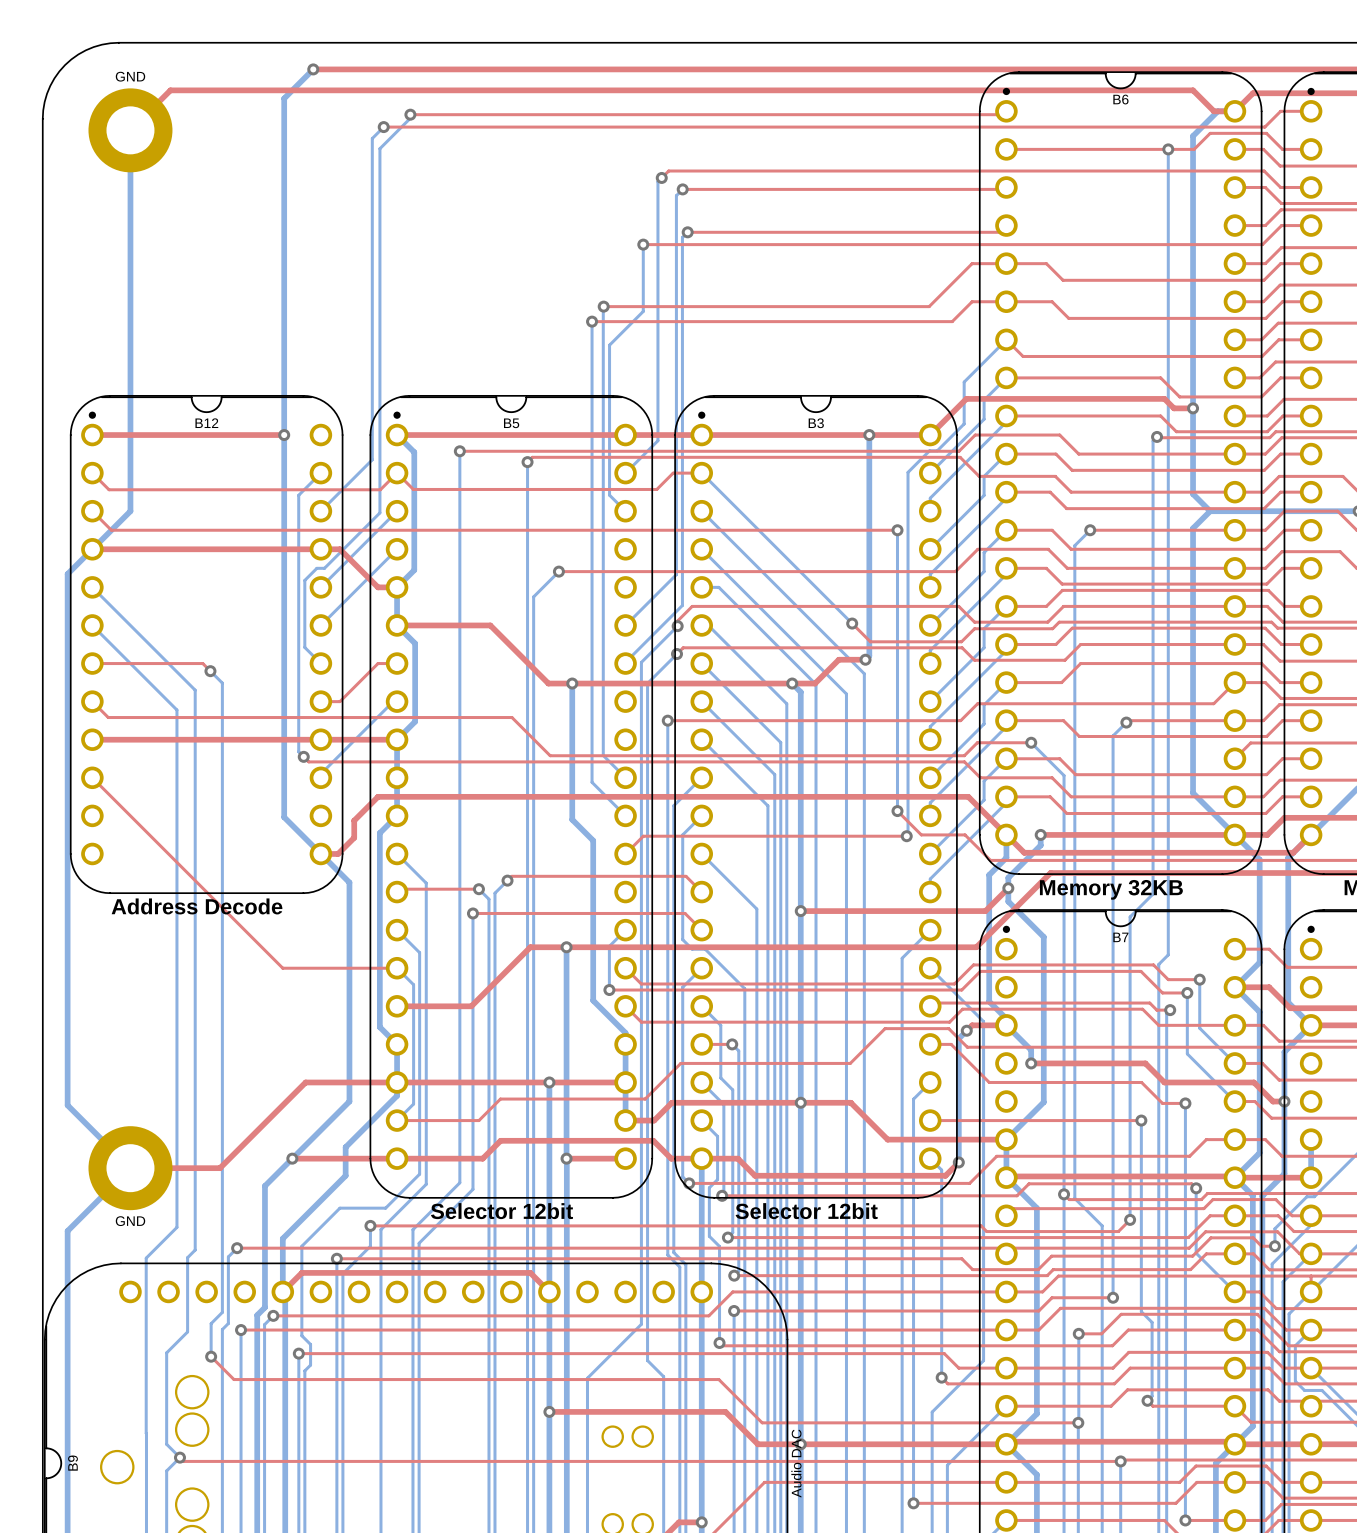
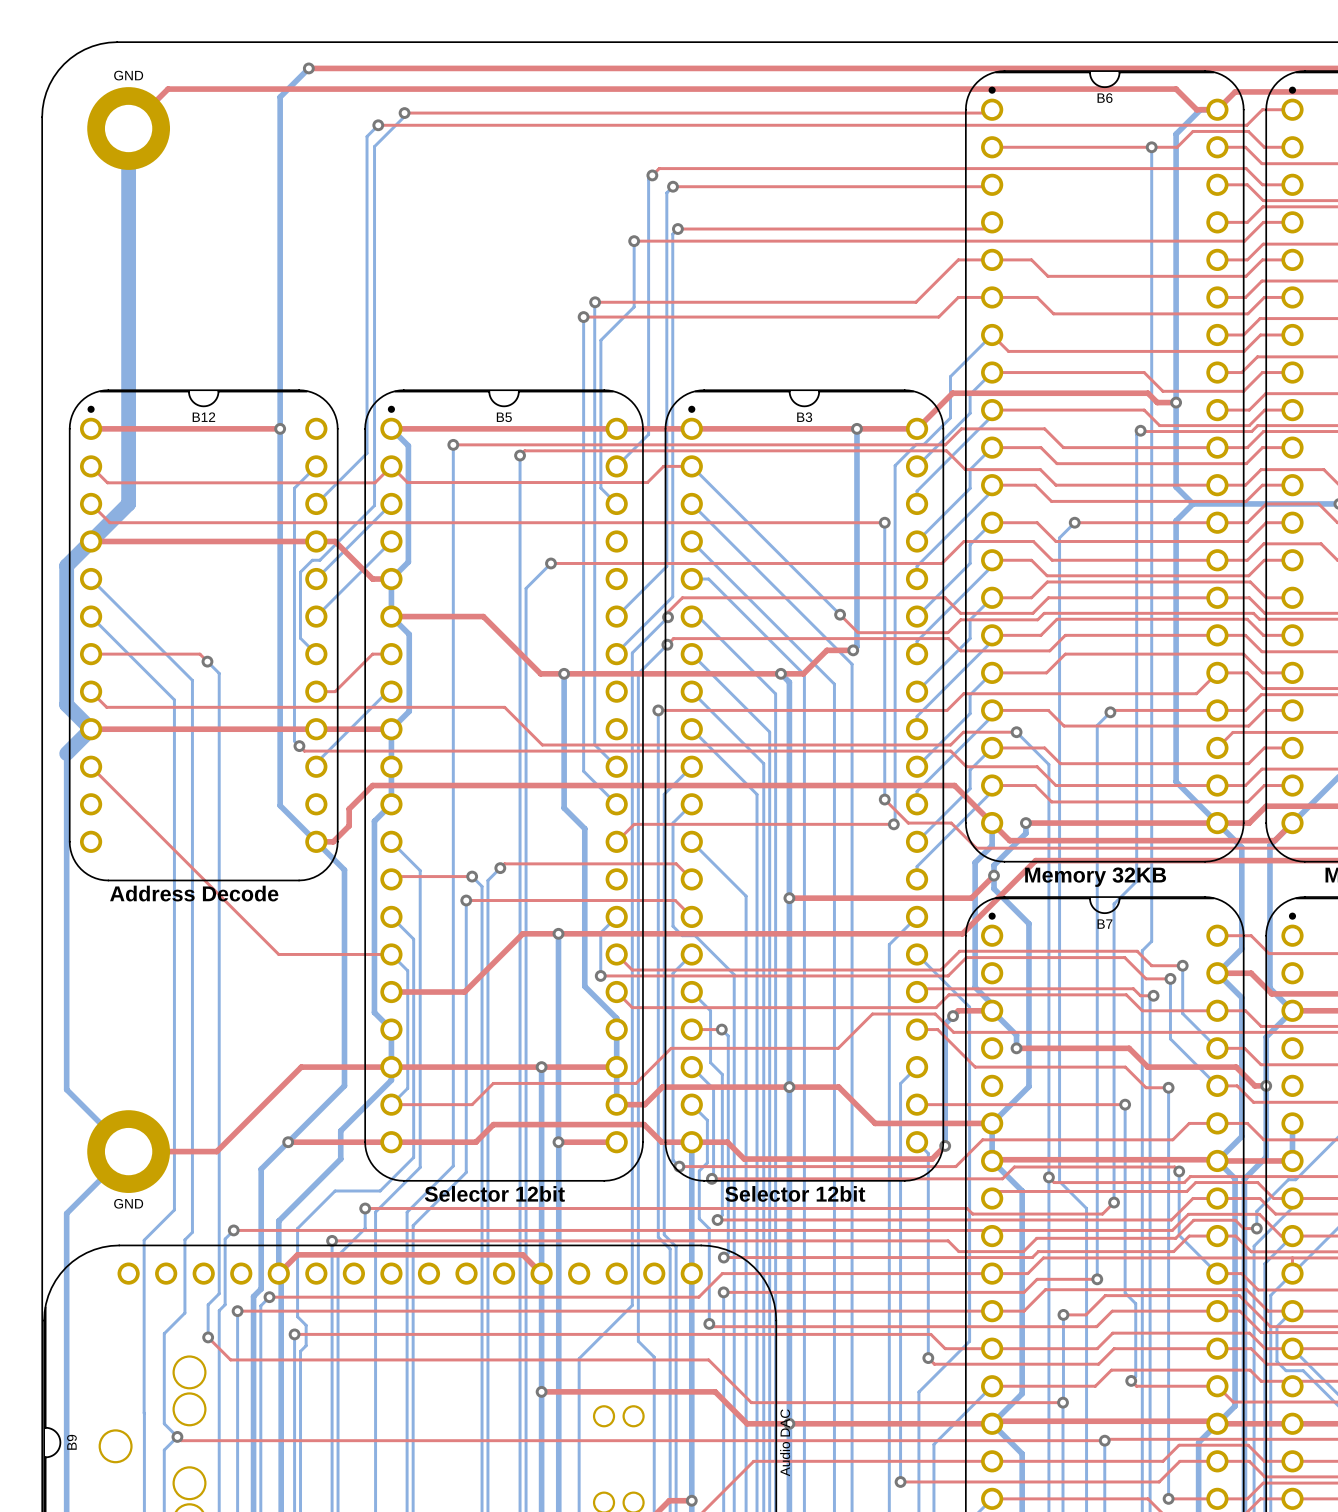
bottom track width: thin (130, 130) (130, 511) (67, 574) (67, 714) -> thick (128, 128) (128, 503) (66, 565) (66, 704)
bottom track: (67, 714) (67, 764) -> (66, 704) (91, 729) (66, 753)

